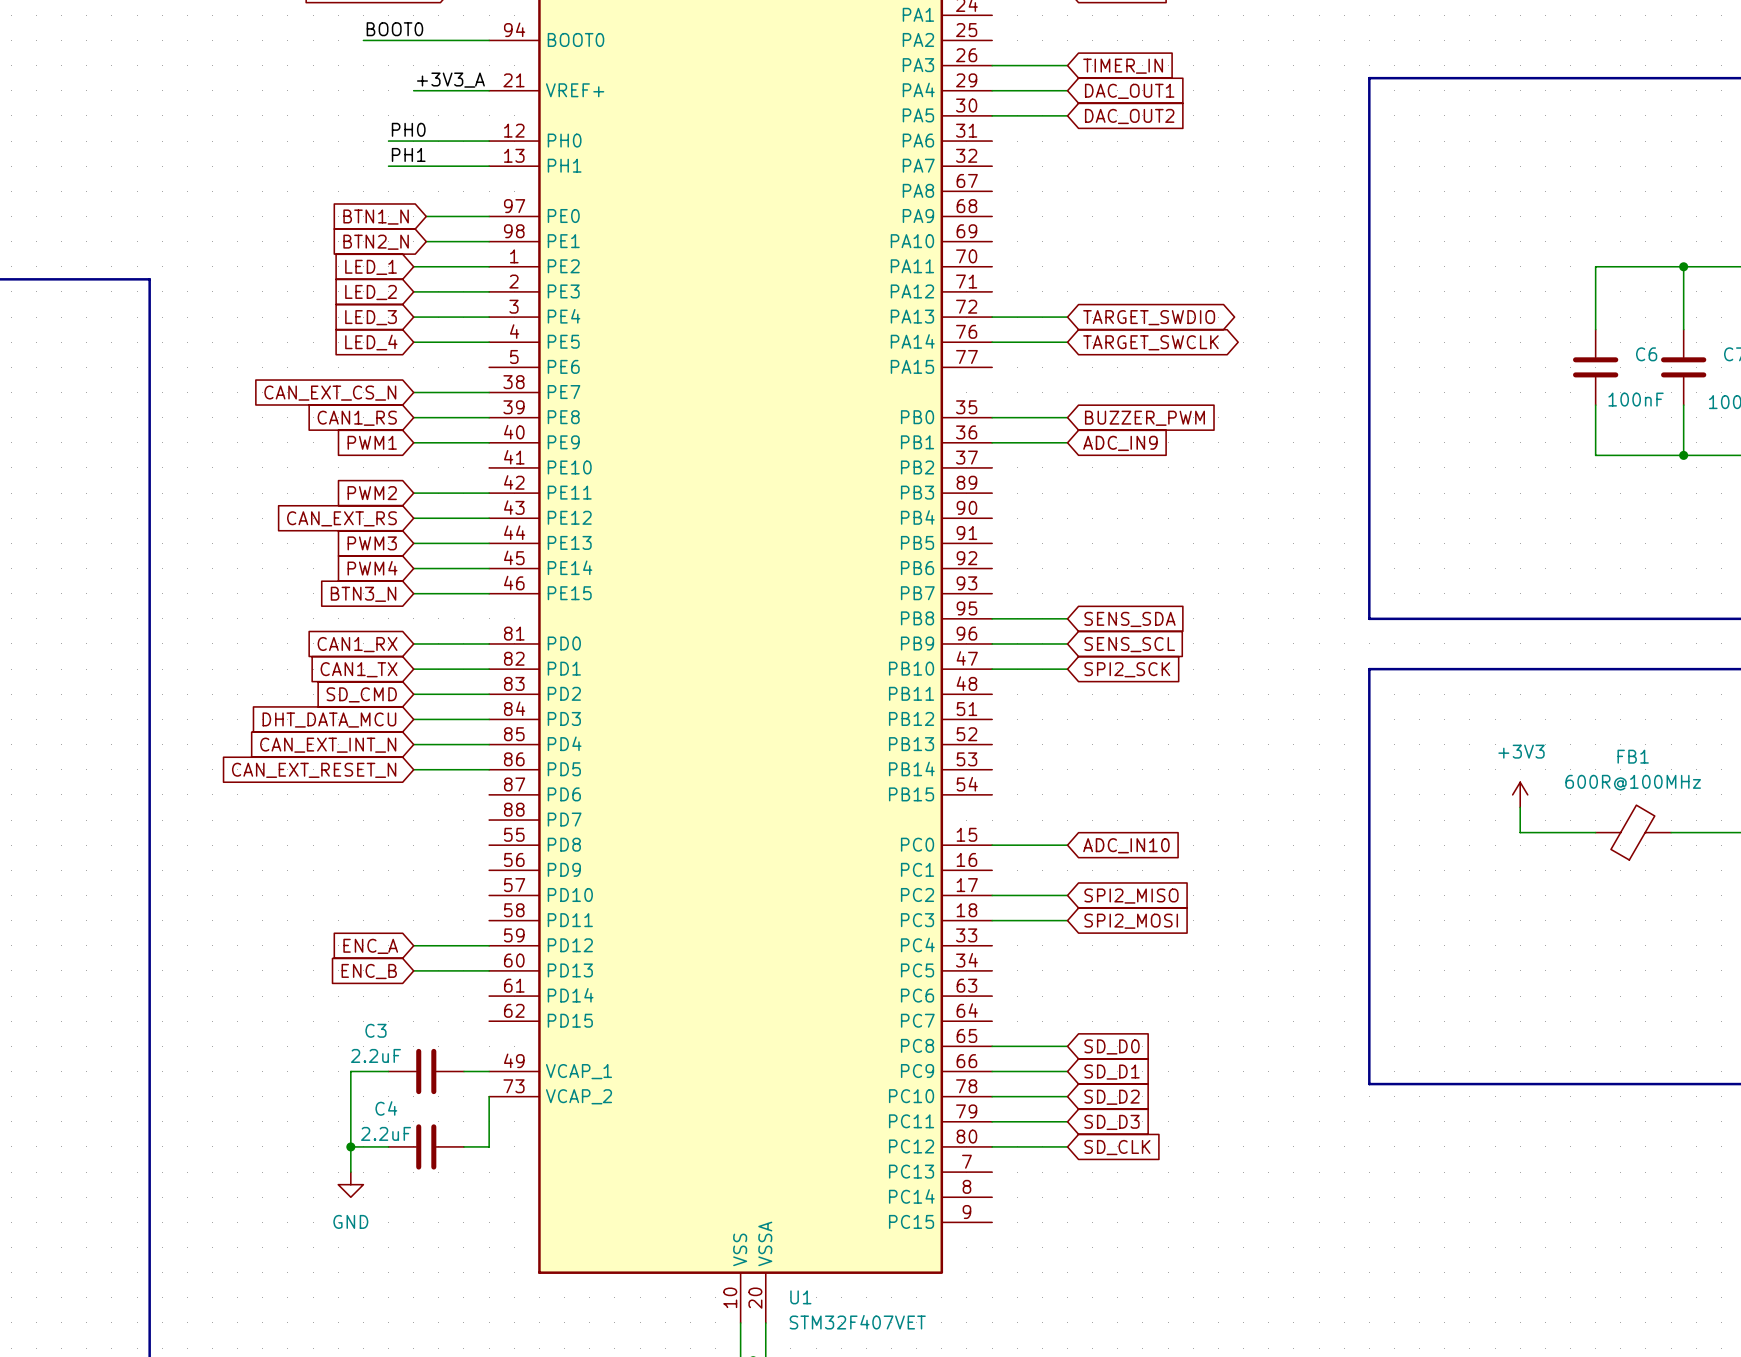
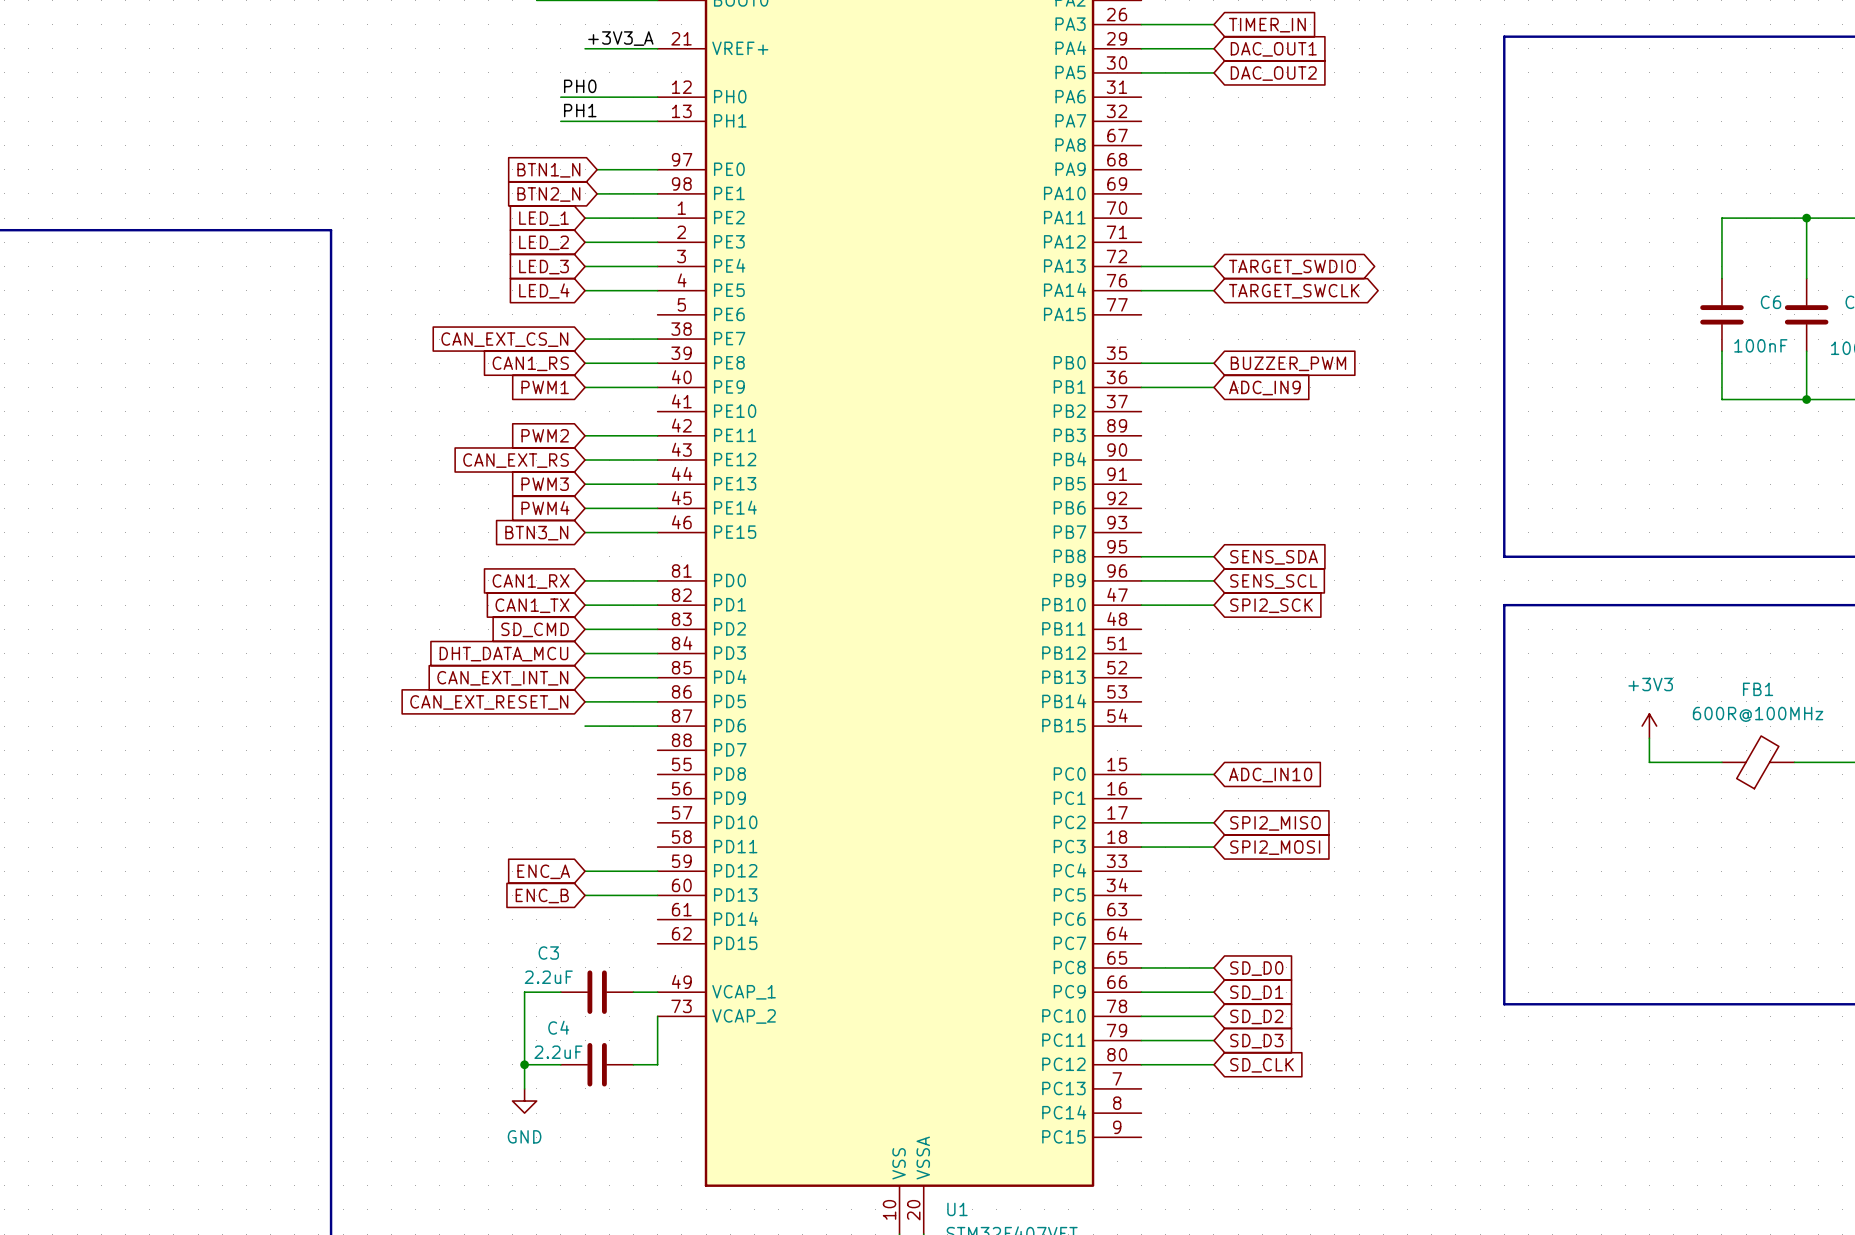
wire: none -> (585, 726) (657, 726)

